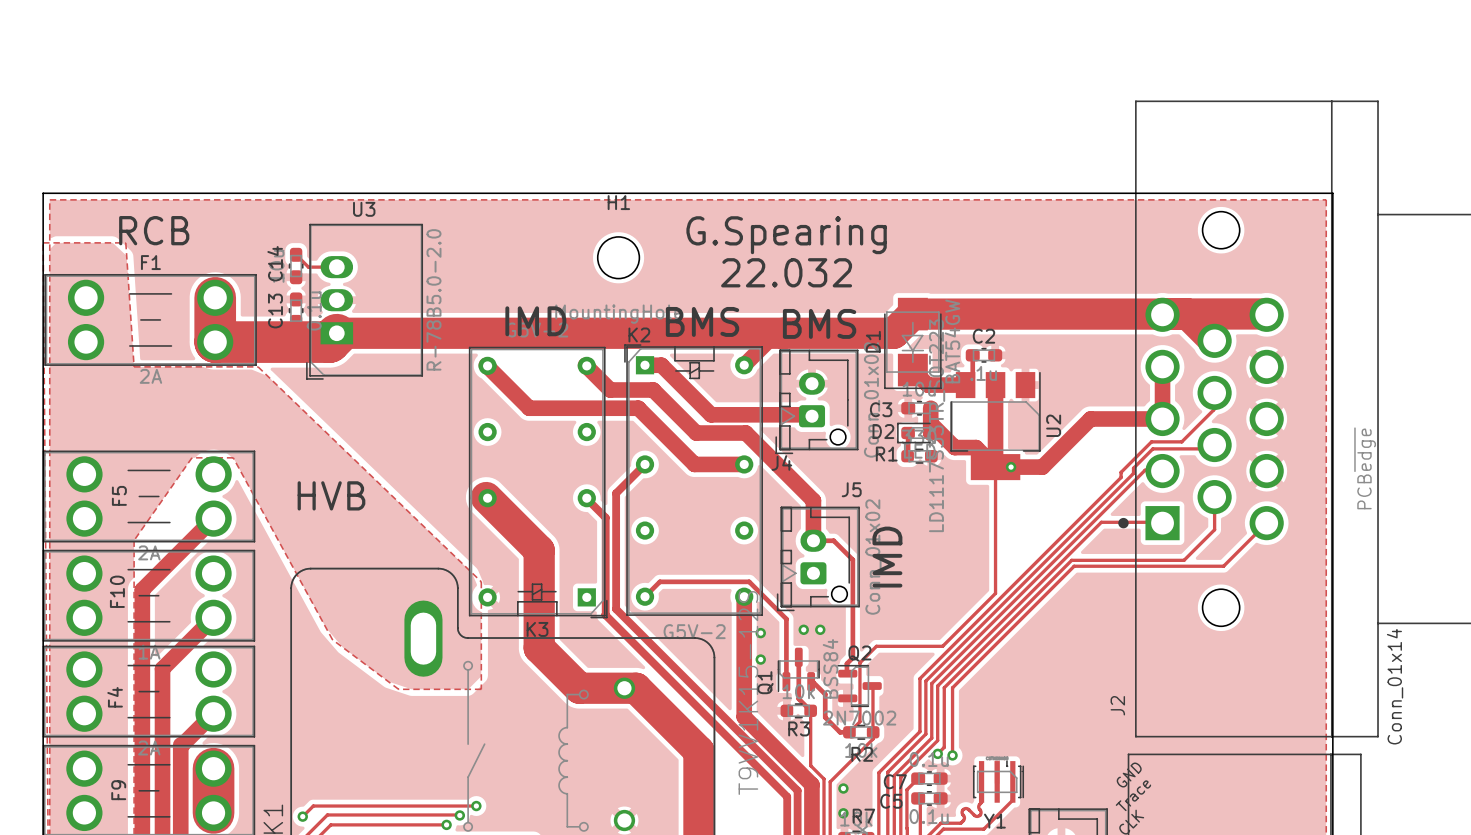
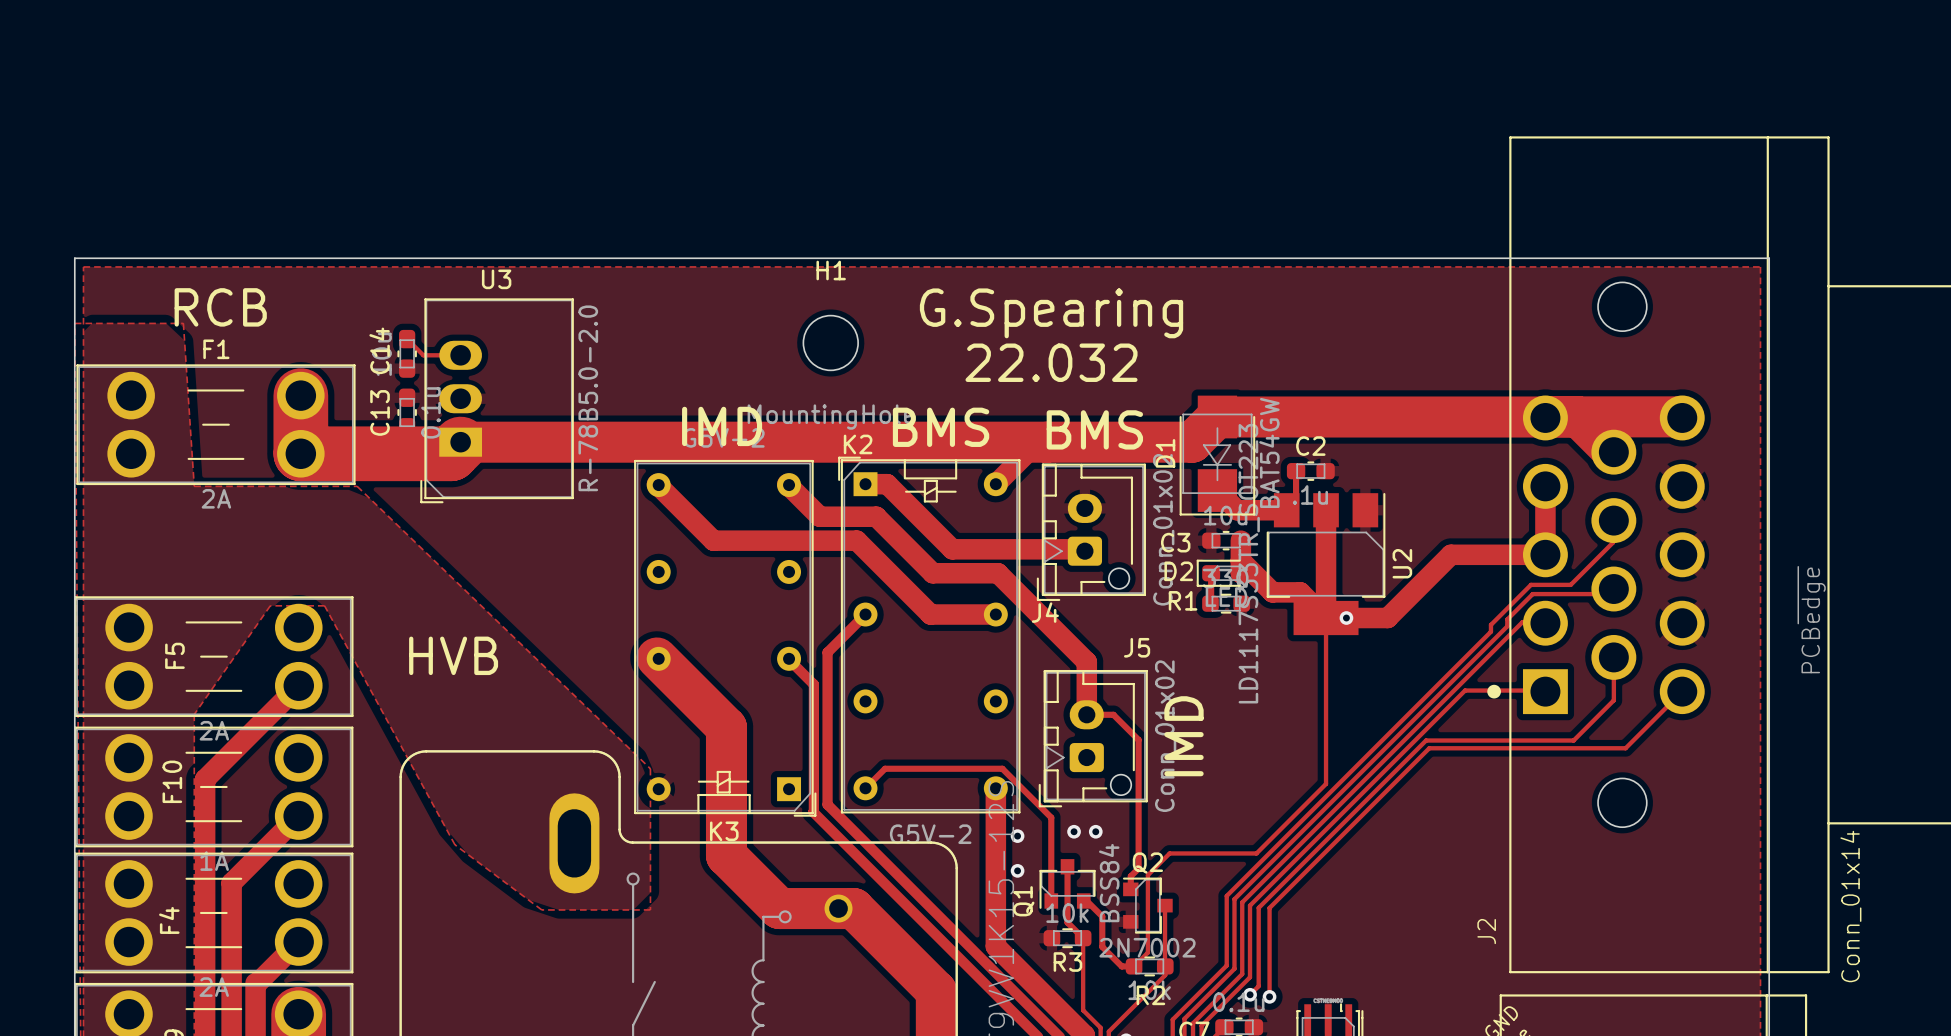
Q1 footprint: [777, 647, 820, 693] -> [1039, 859, 1096, 909]
Q2 footprint: [837, 664, 882, 708] -> [1122, 877, 1173, 934]

